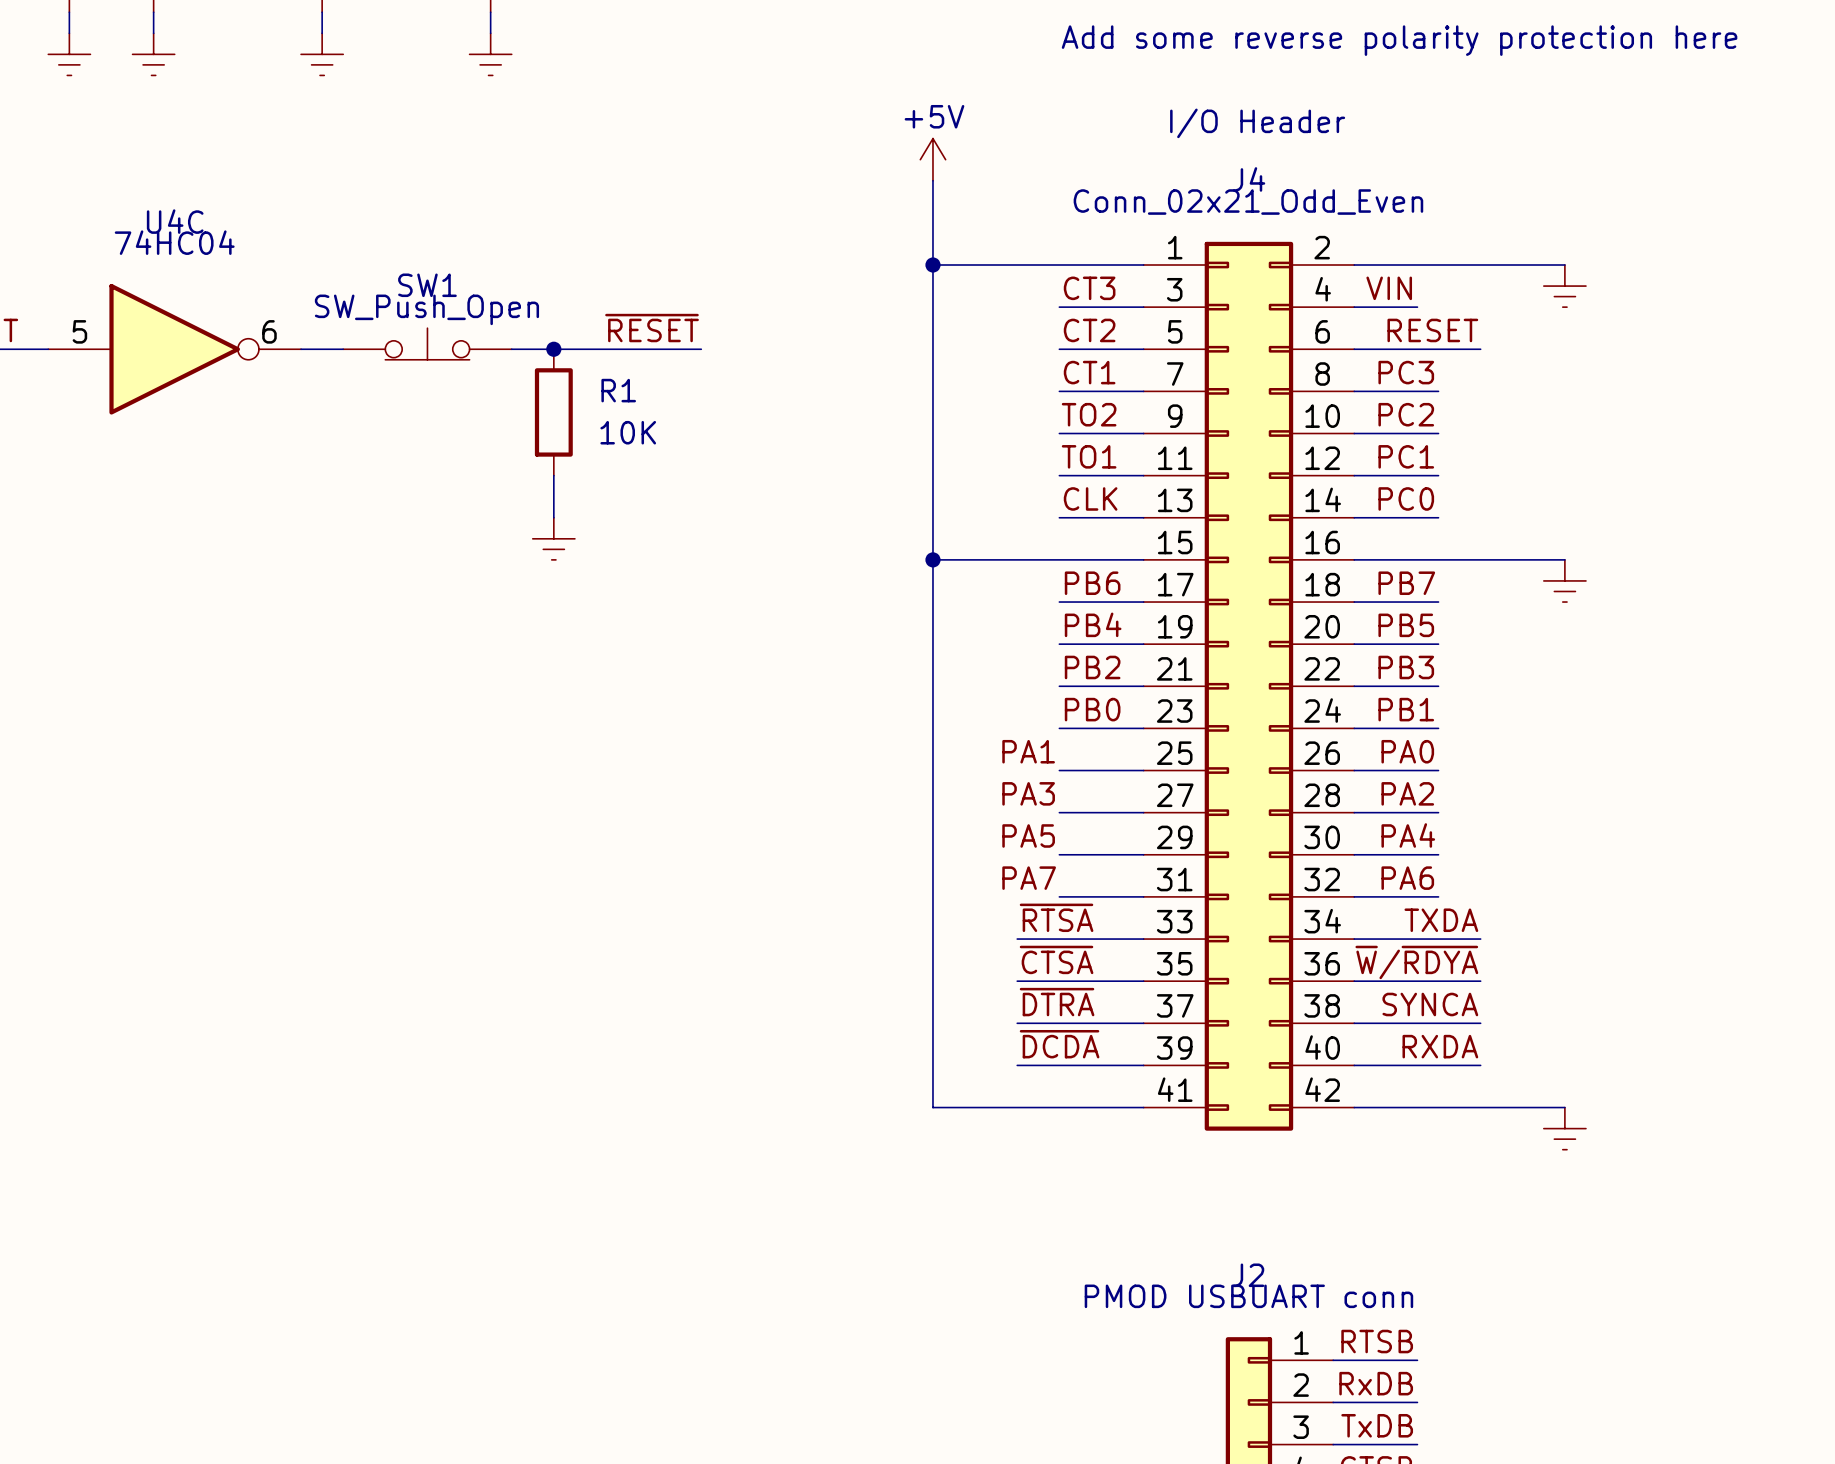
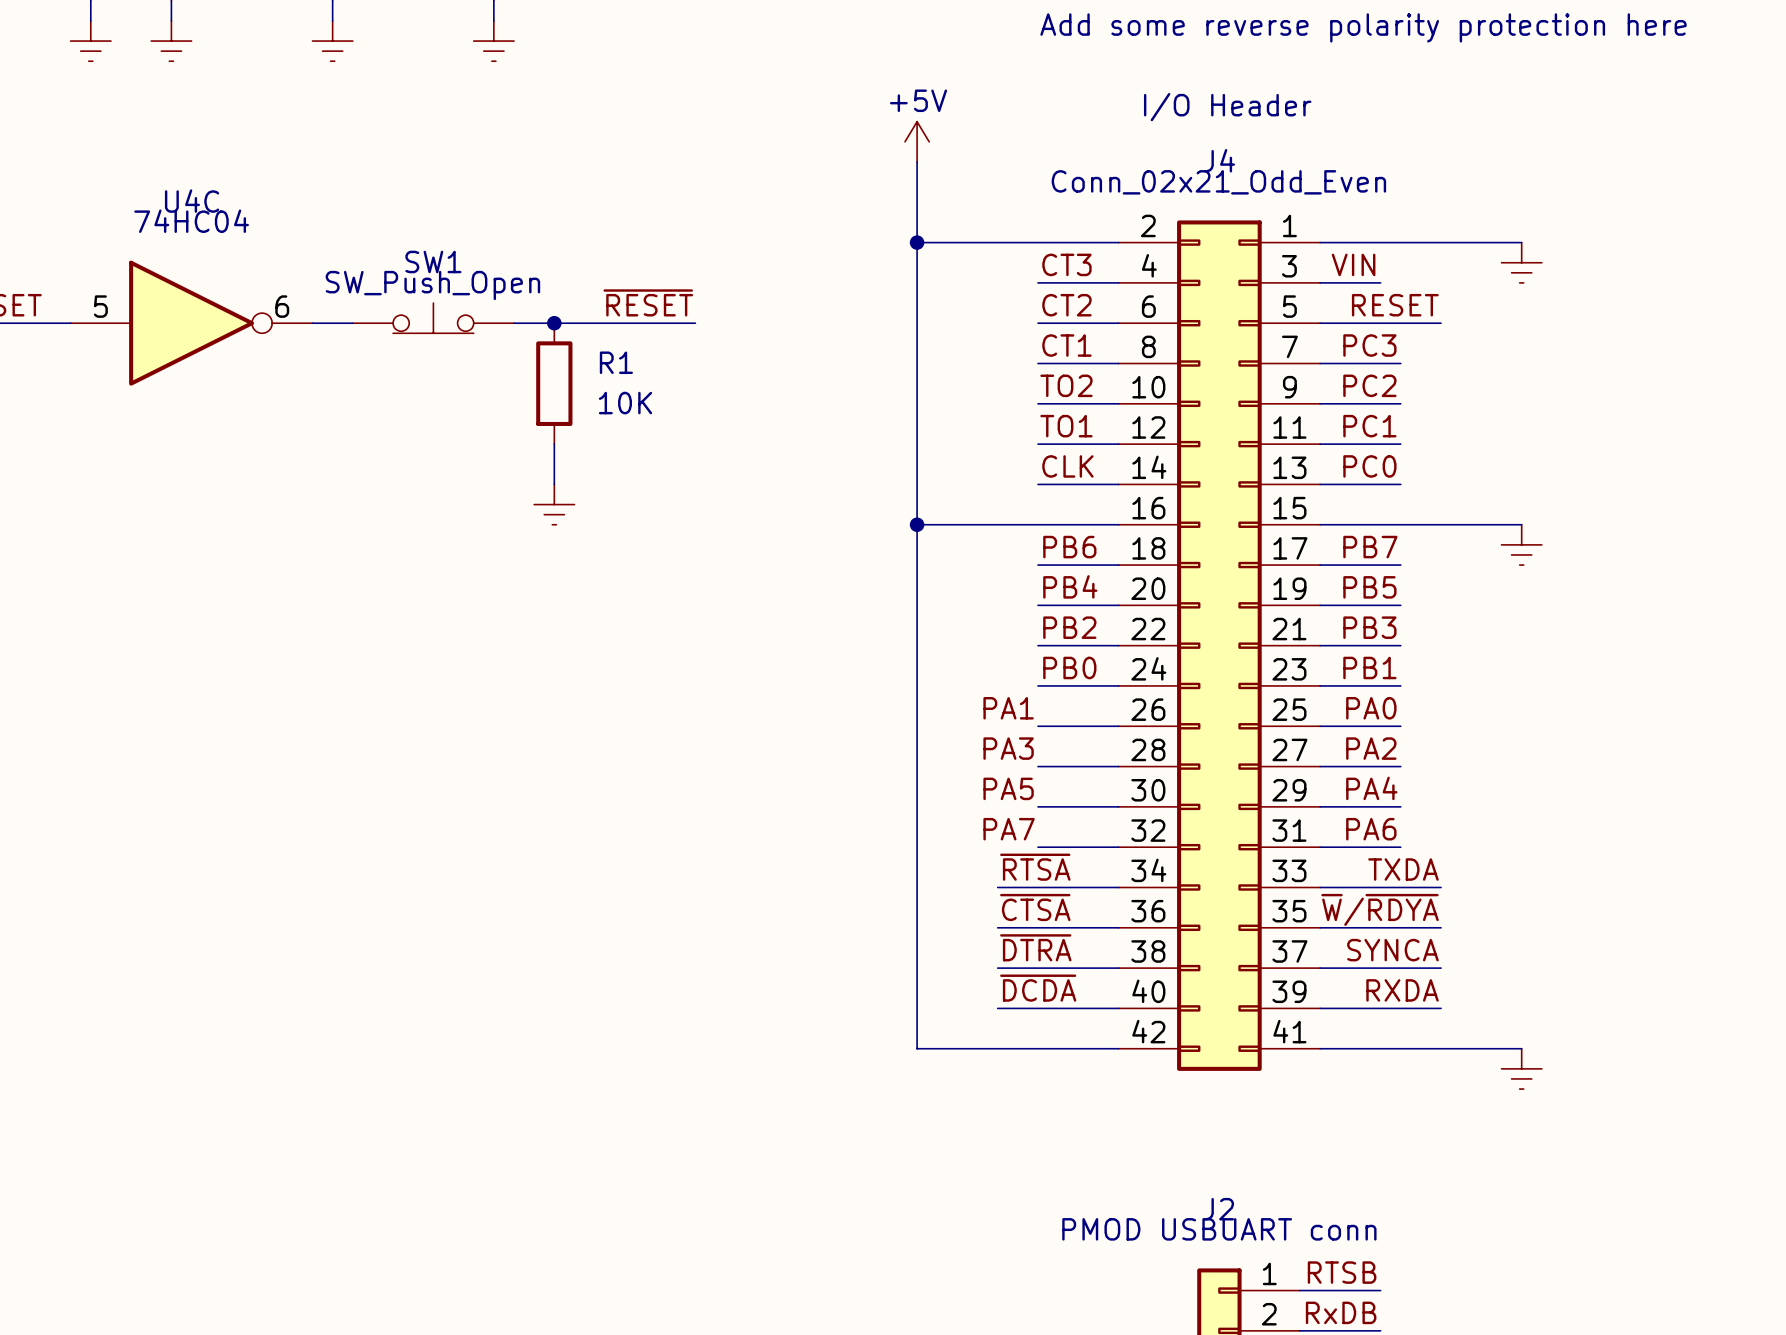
J4 flip: as is (1248, 686) -> left-right (1219, 645)

